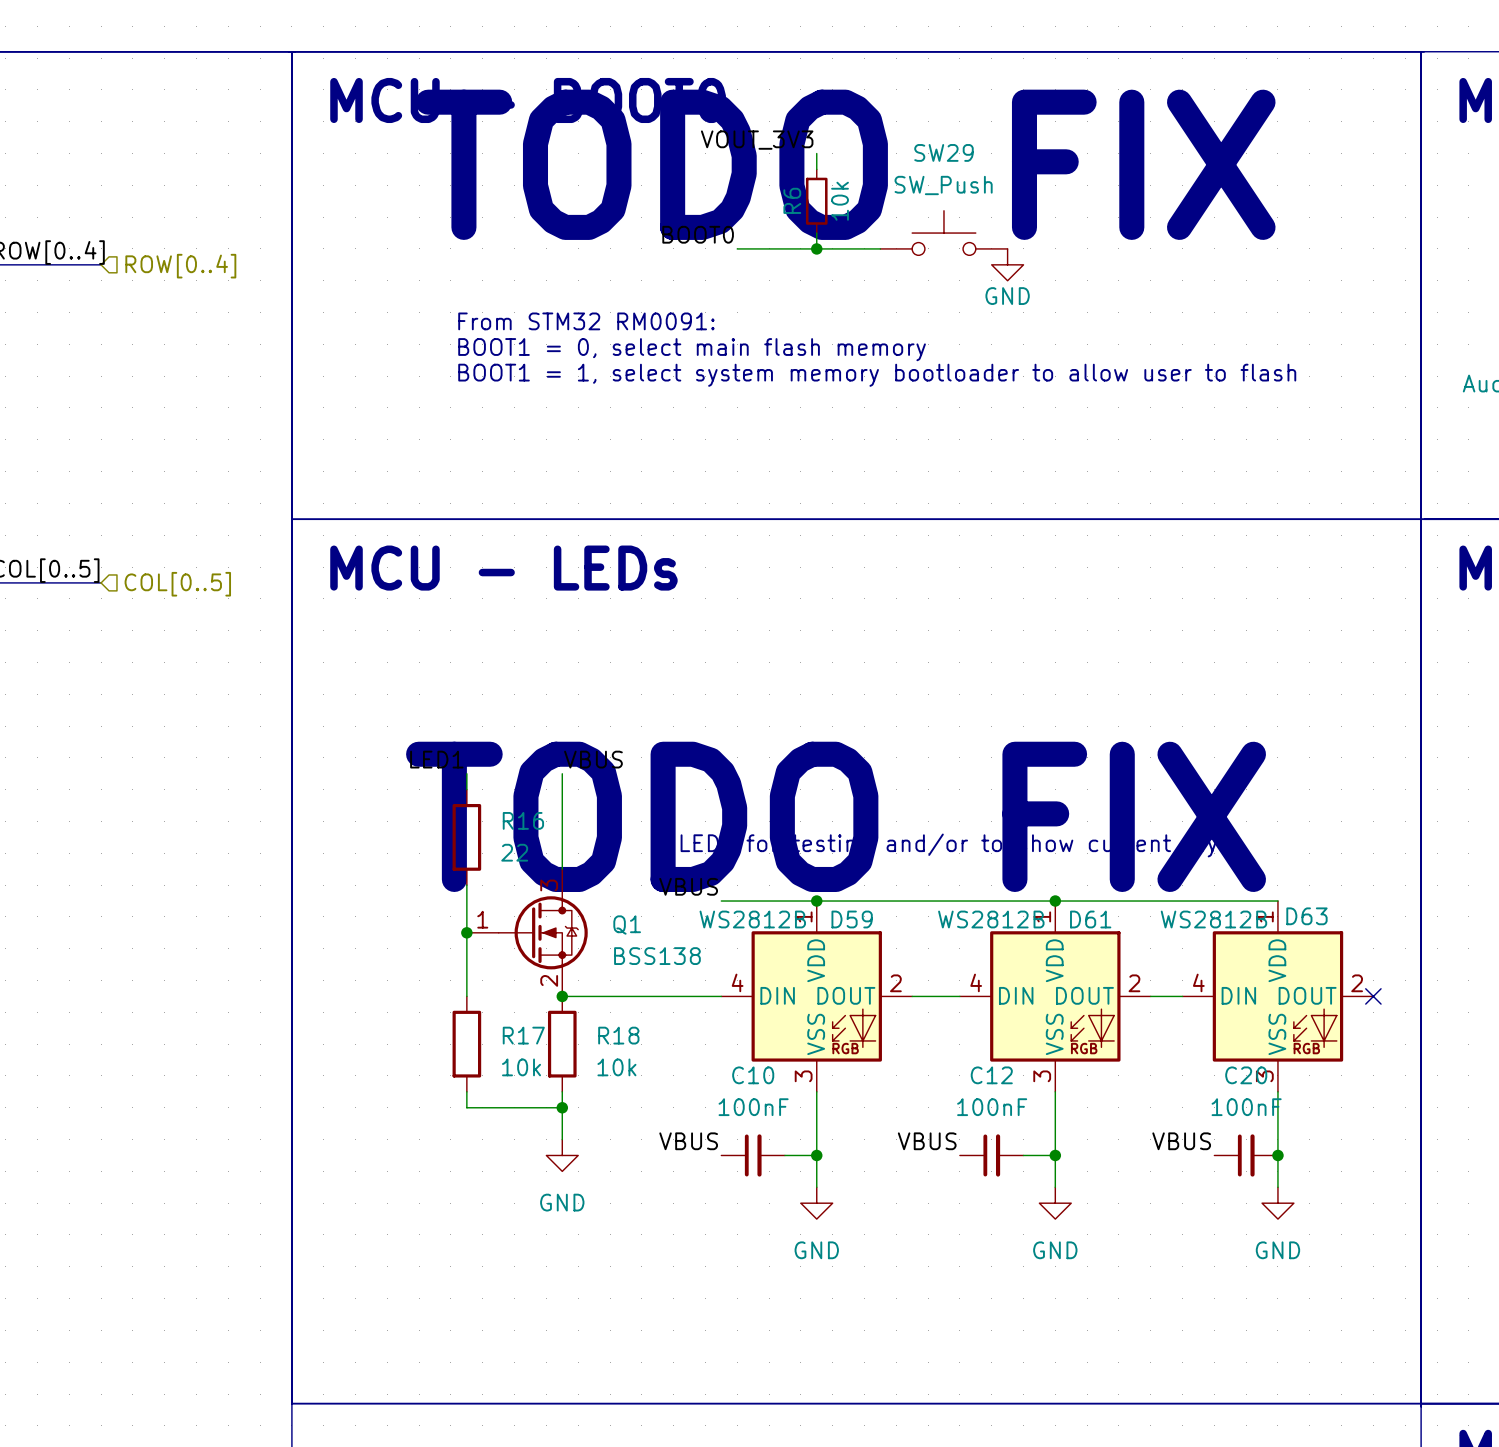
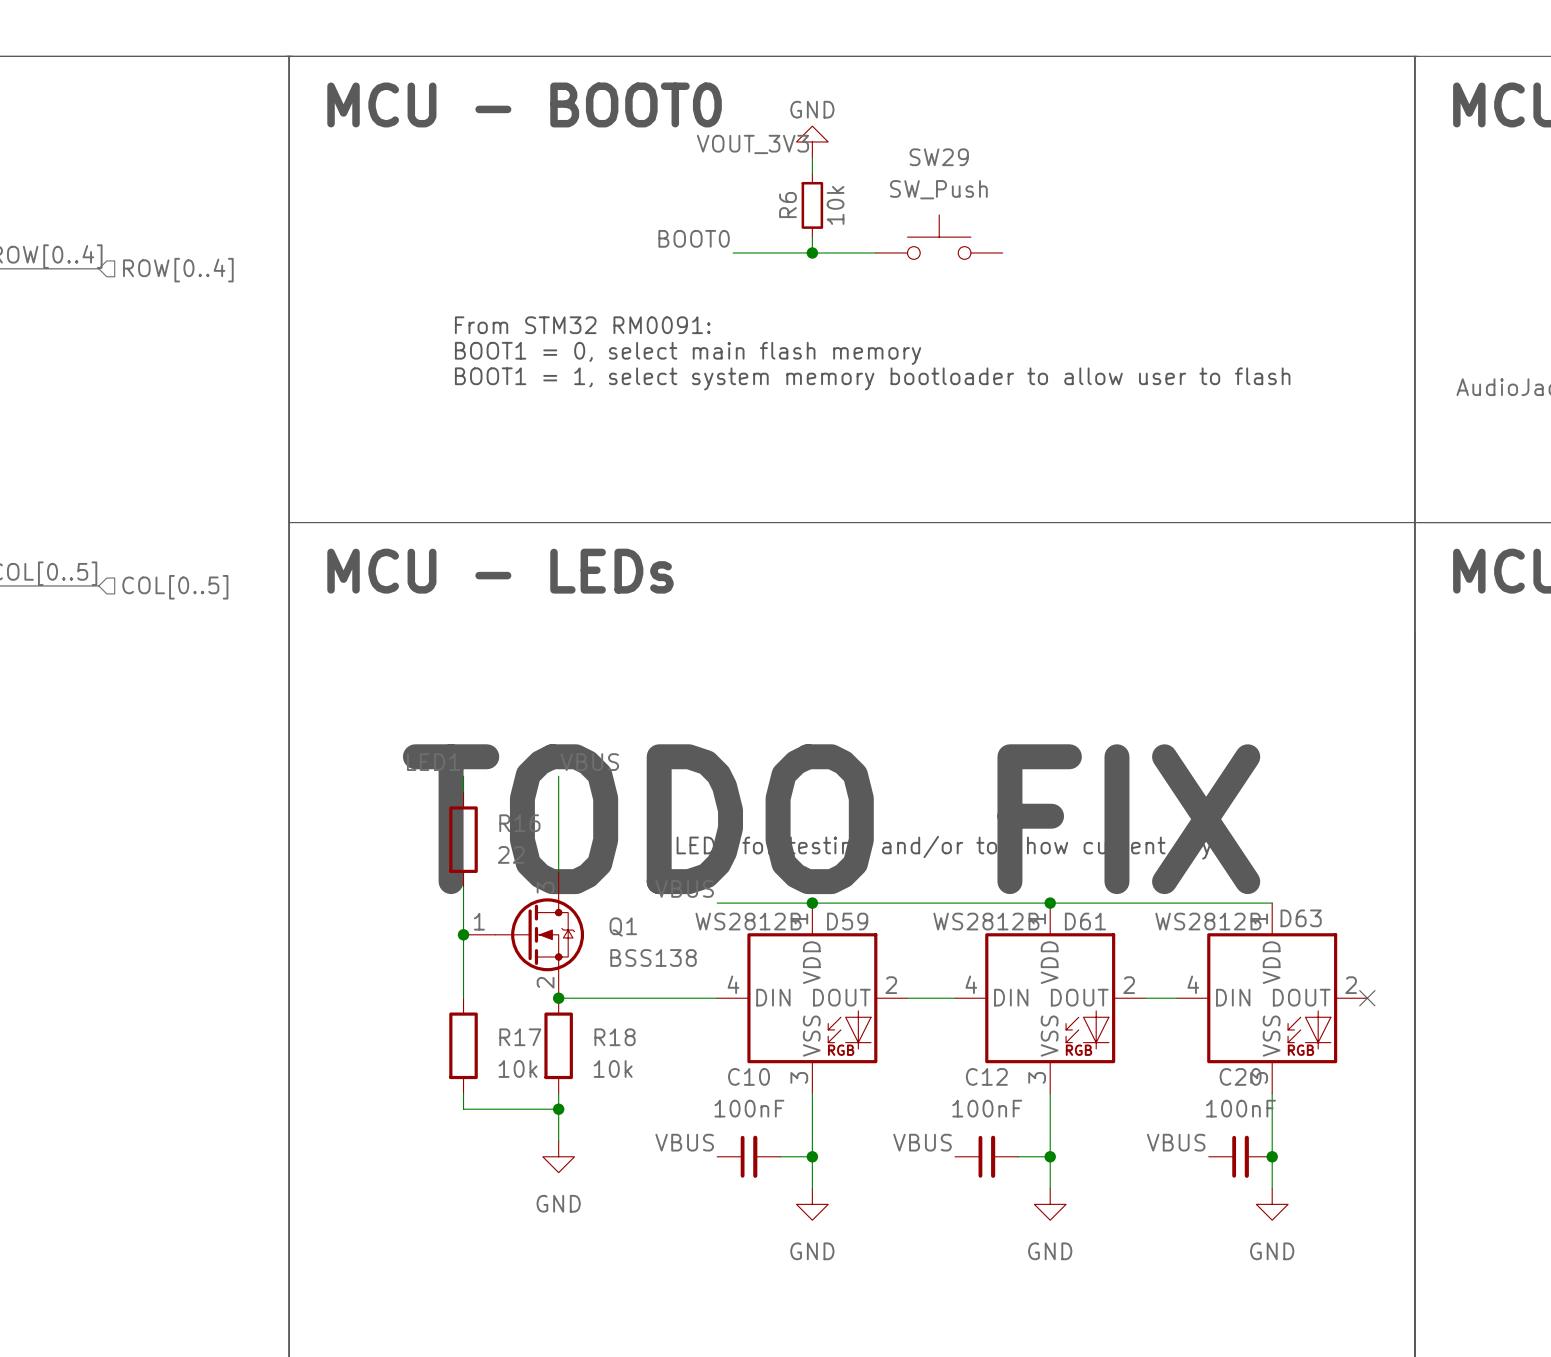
text: TODO FIX (845, 164) -> none
power symbol rotation: 0° (1007, 264) -> 180° (812, 141)
power symbol position: GND (1007, 264) -> GND (812, 141)

